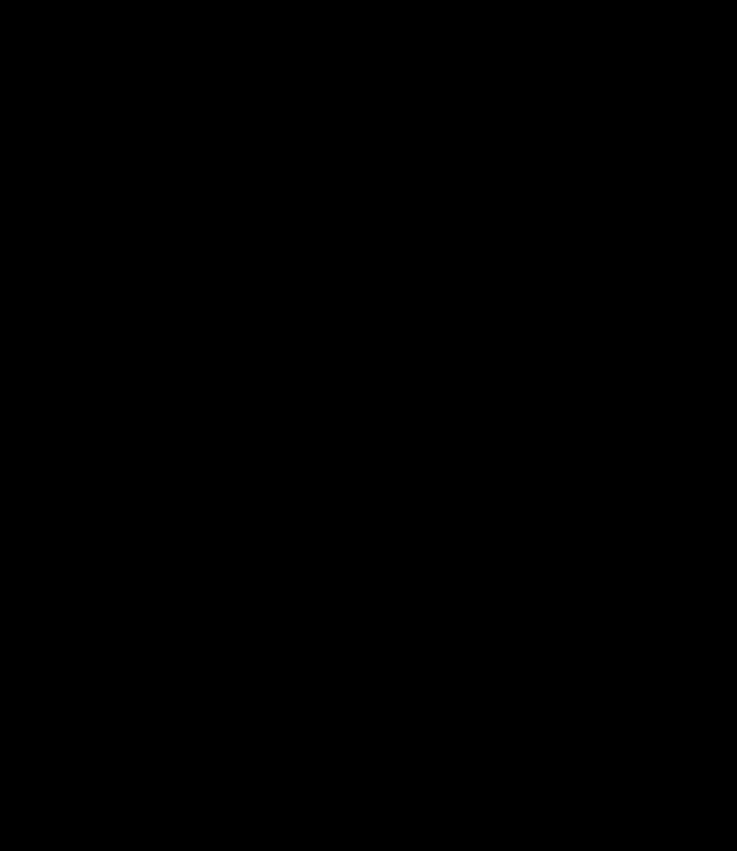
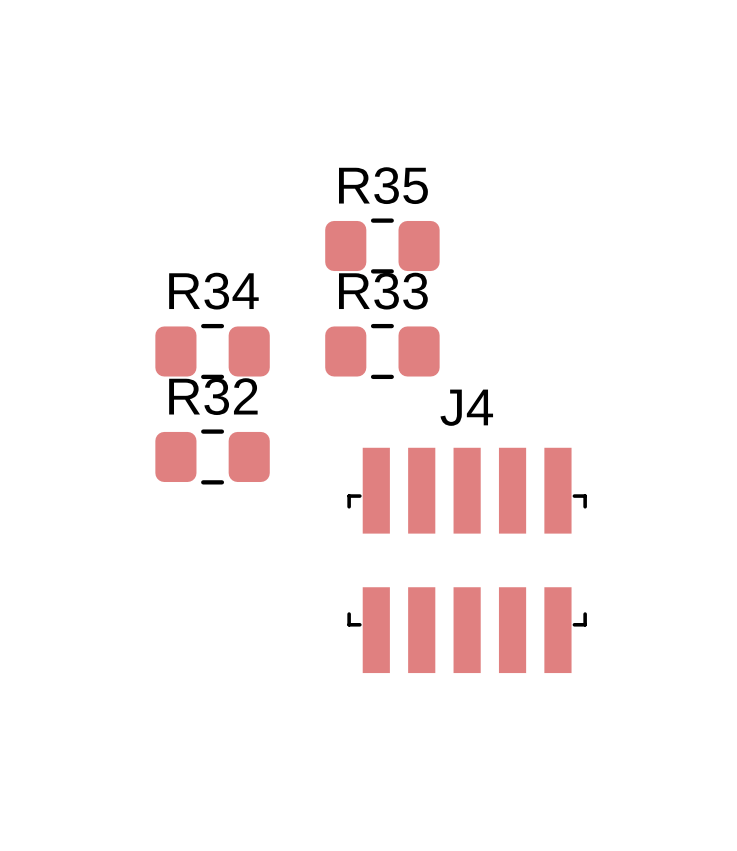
R35: none -> (382, 246)
R34: none -> (212, 351)
R33: none -> (382, 351)
R32: none -> (212, 456)
J4: none -> (467, 560)

